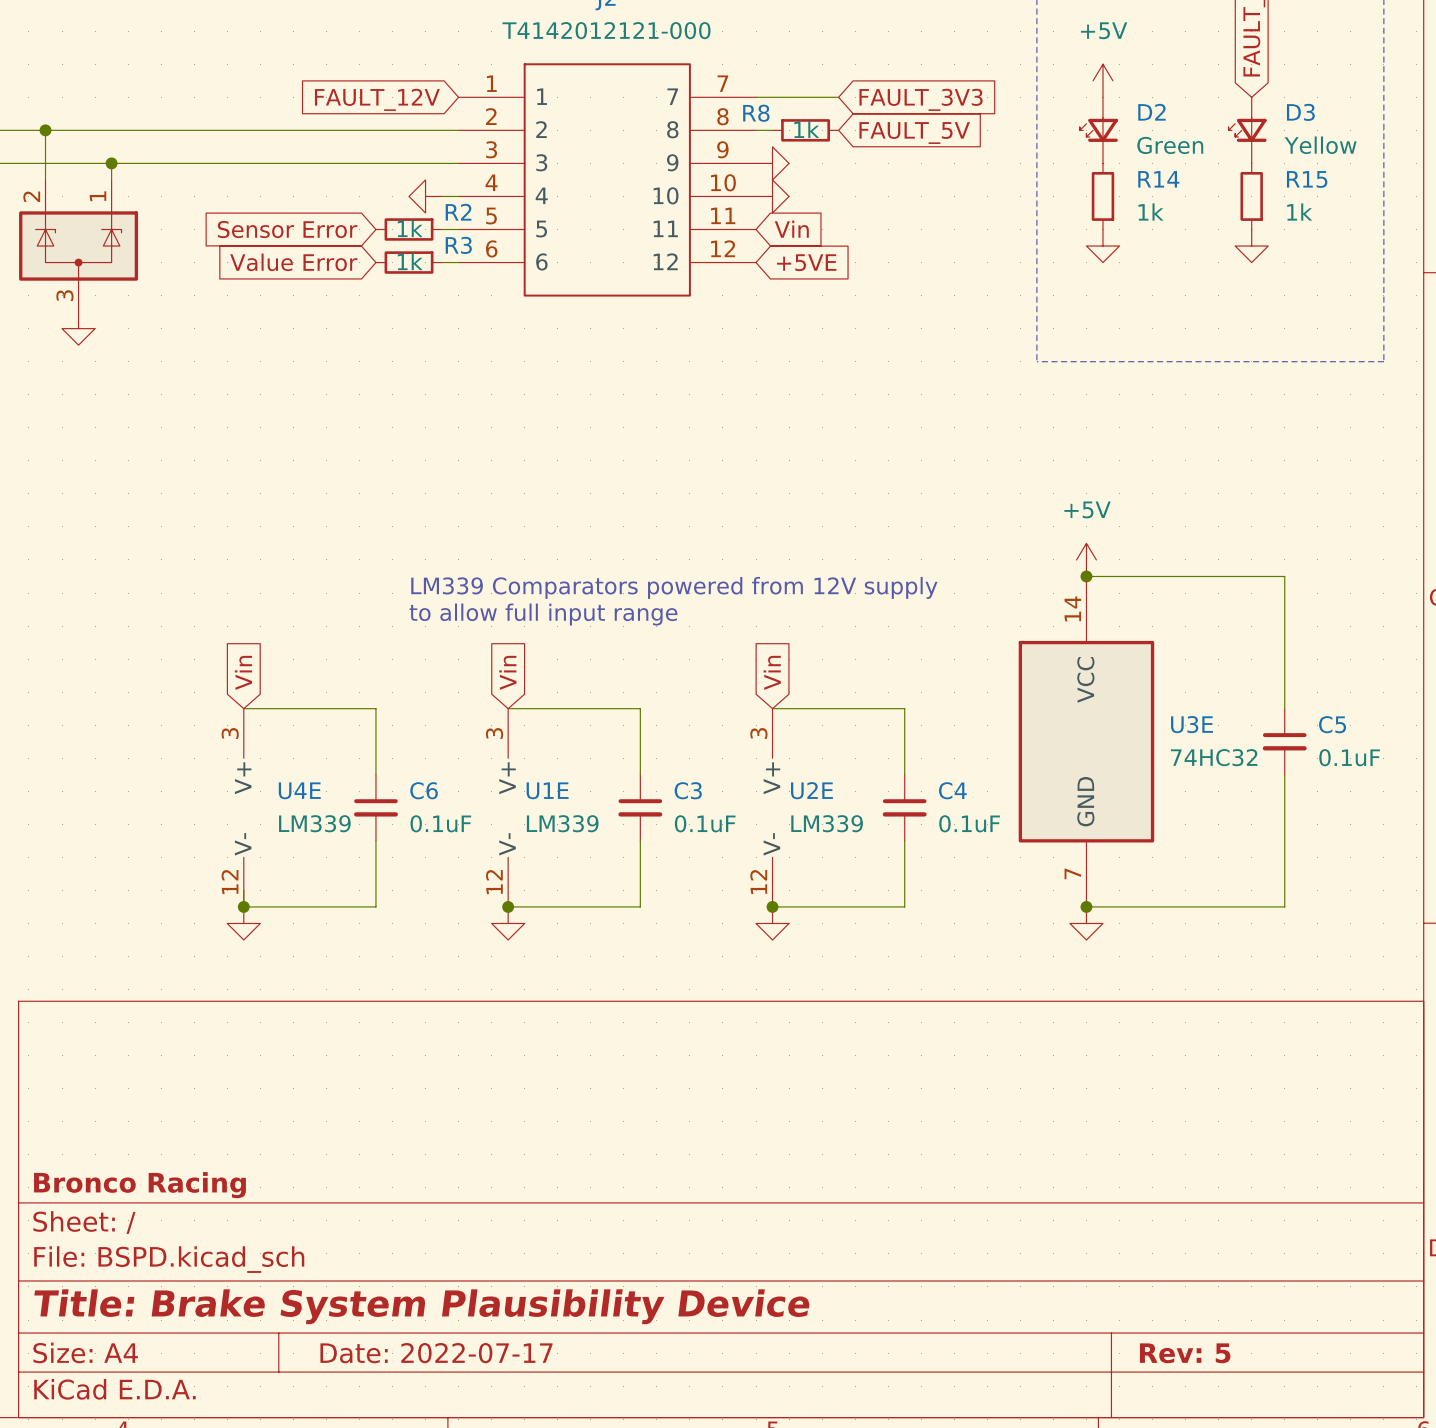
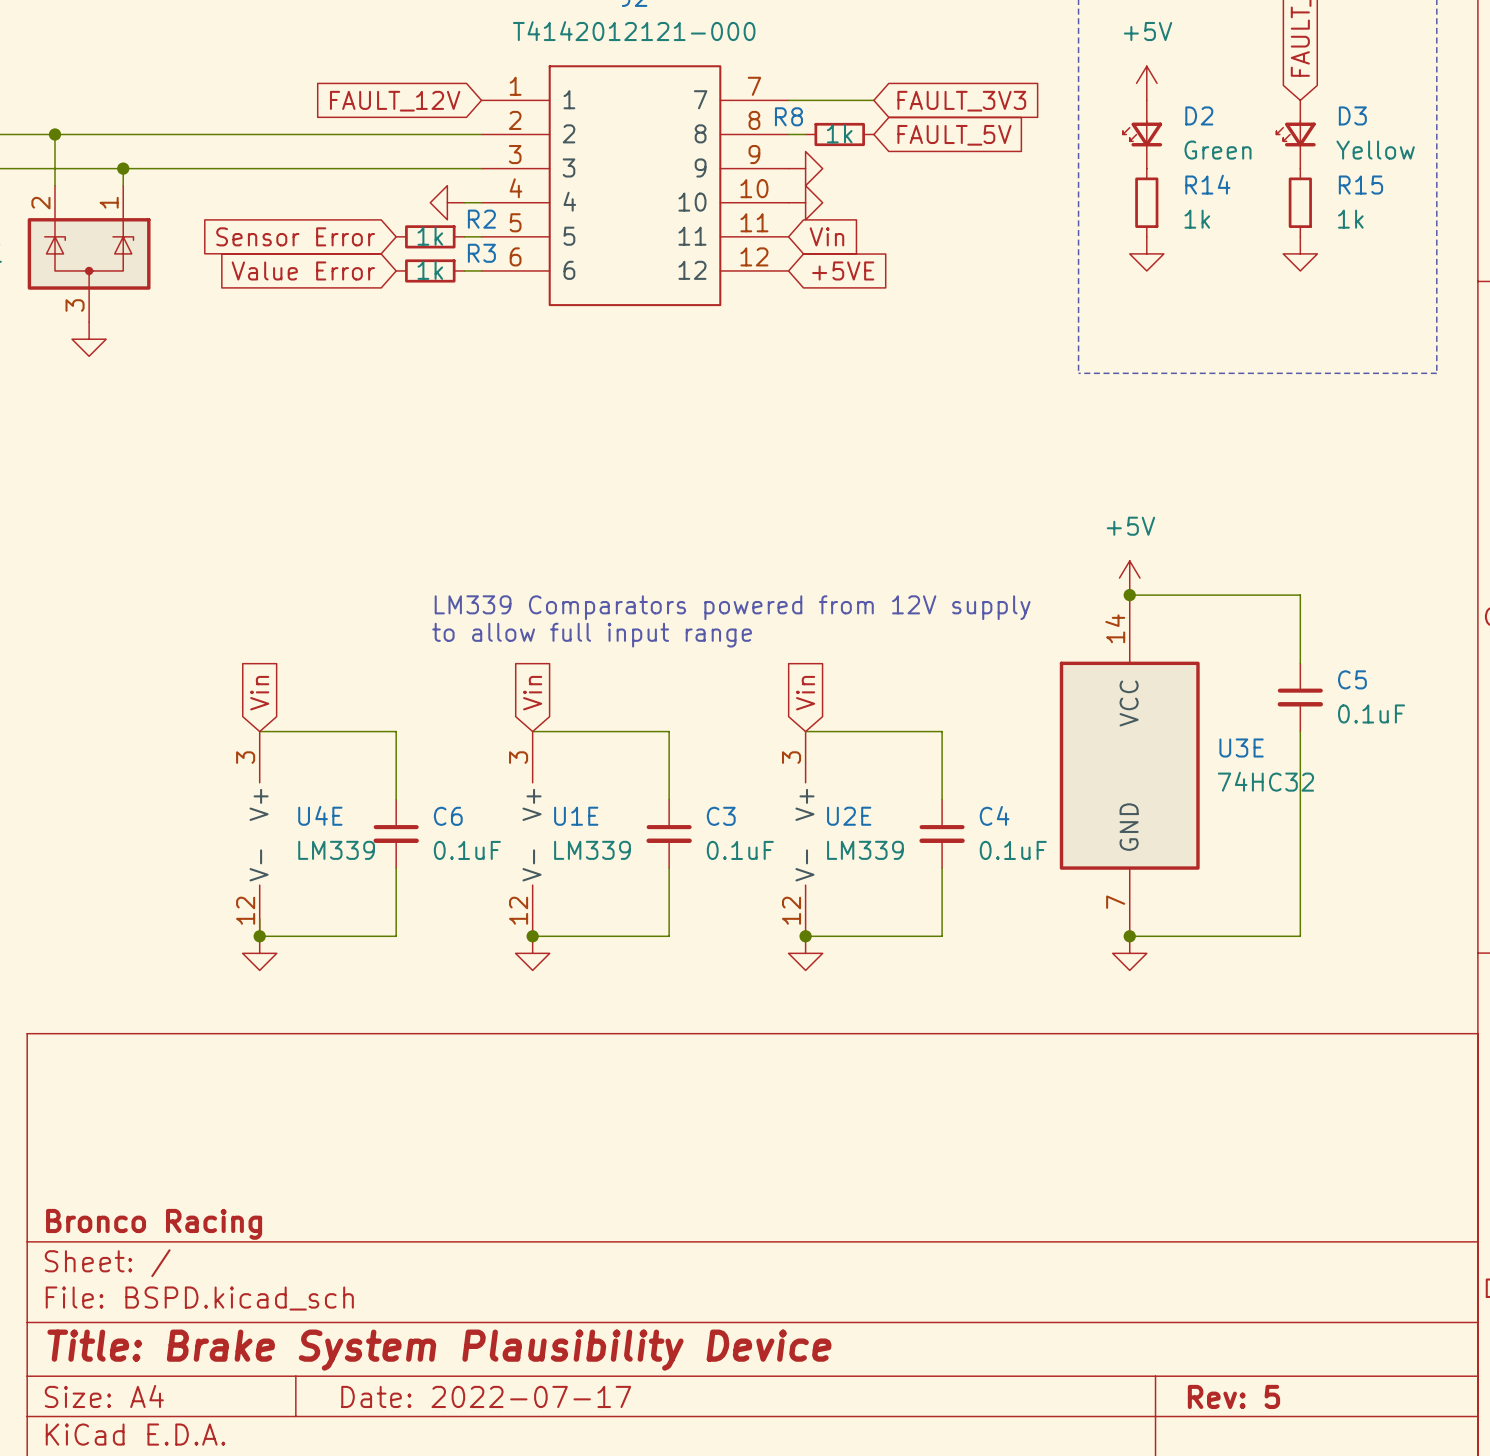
wire: (1251, 576) (1284, 576) (1284, 708) -> (1300, 595) (1300, 663)
C5 position: (1284, 741) -> (1300, 697)
wire: (1284, 774) (1284, 906) (1251, 906) -> (1300, 731) (1300, 936)

